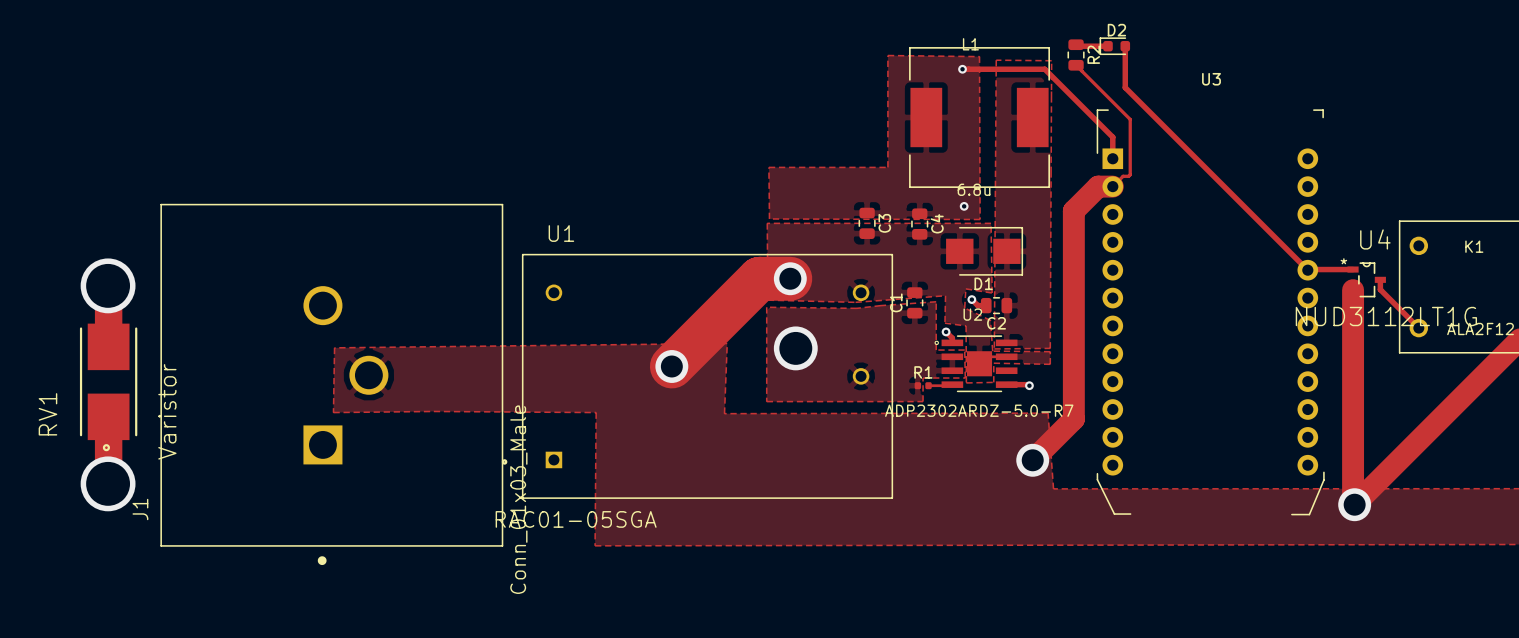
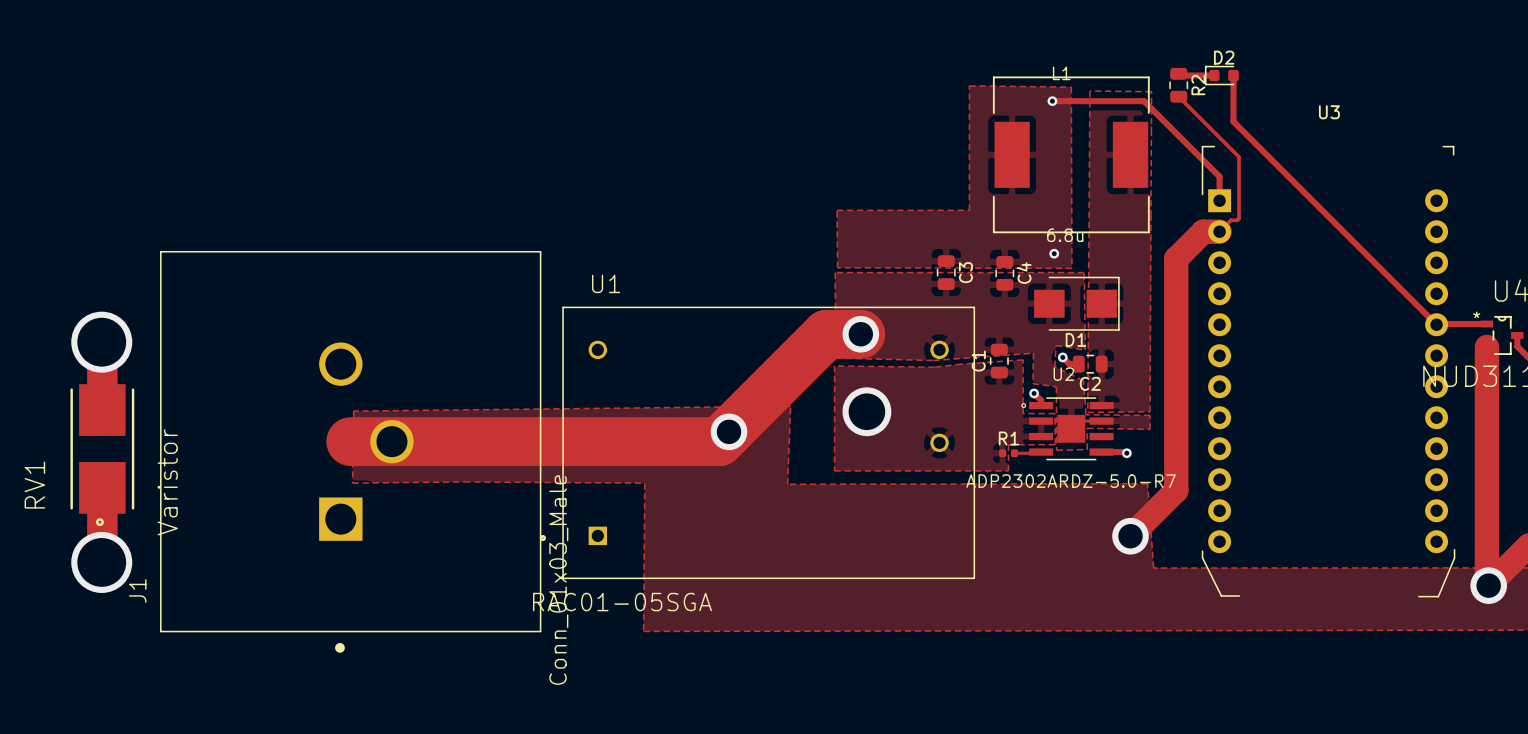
track: none -> (729, 431) (719, 441) (350, 441)

